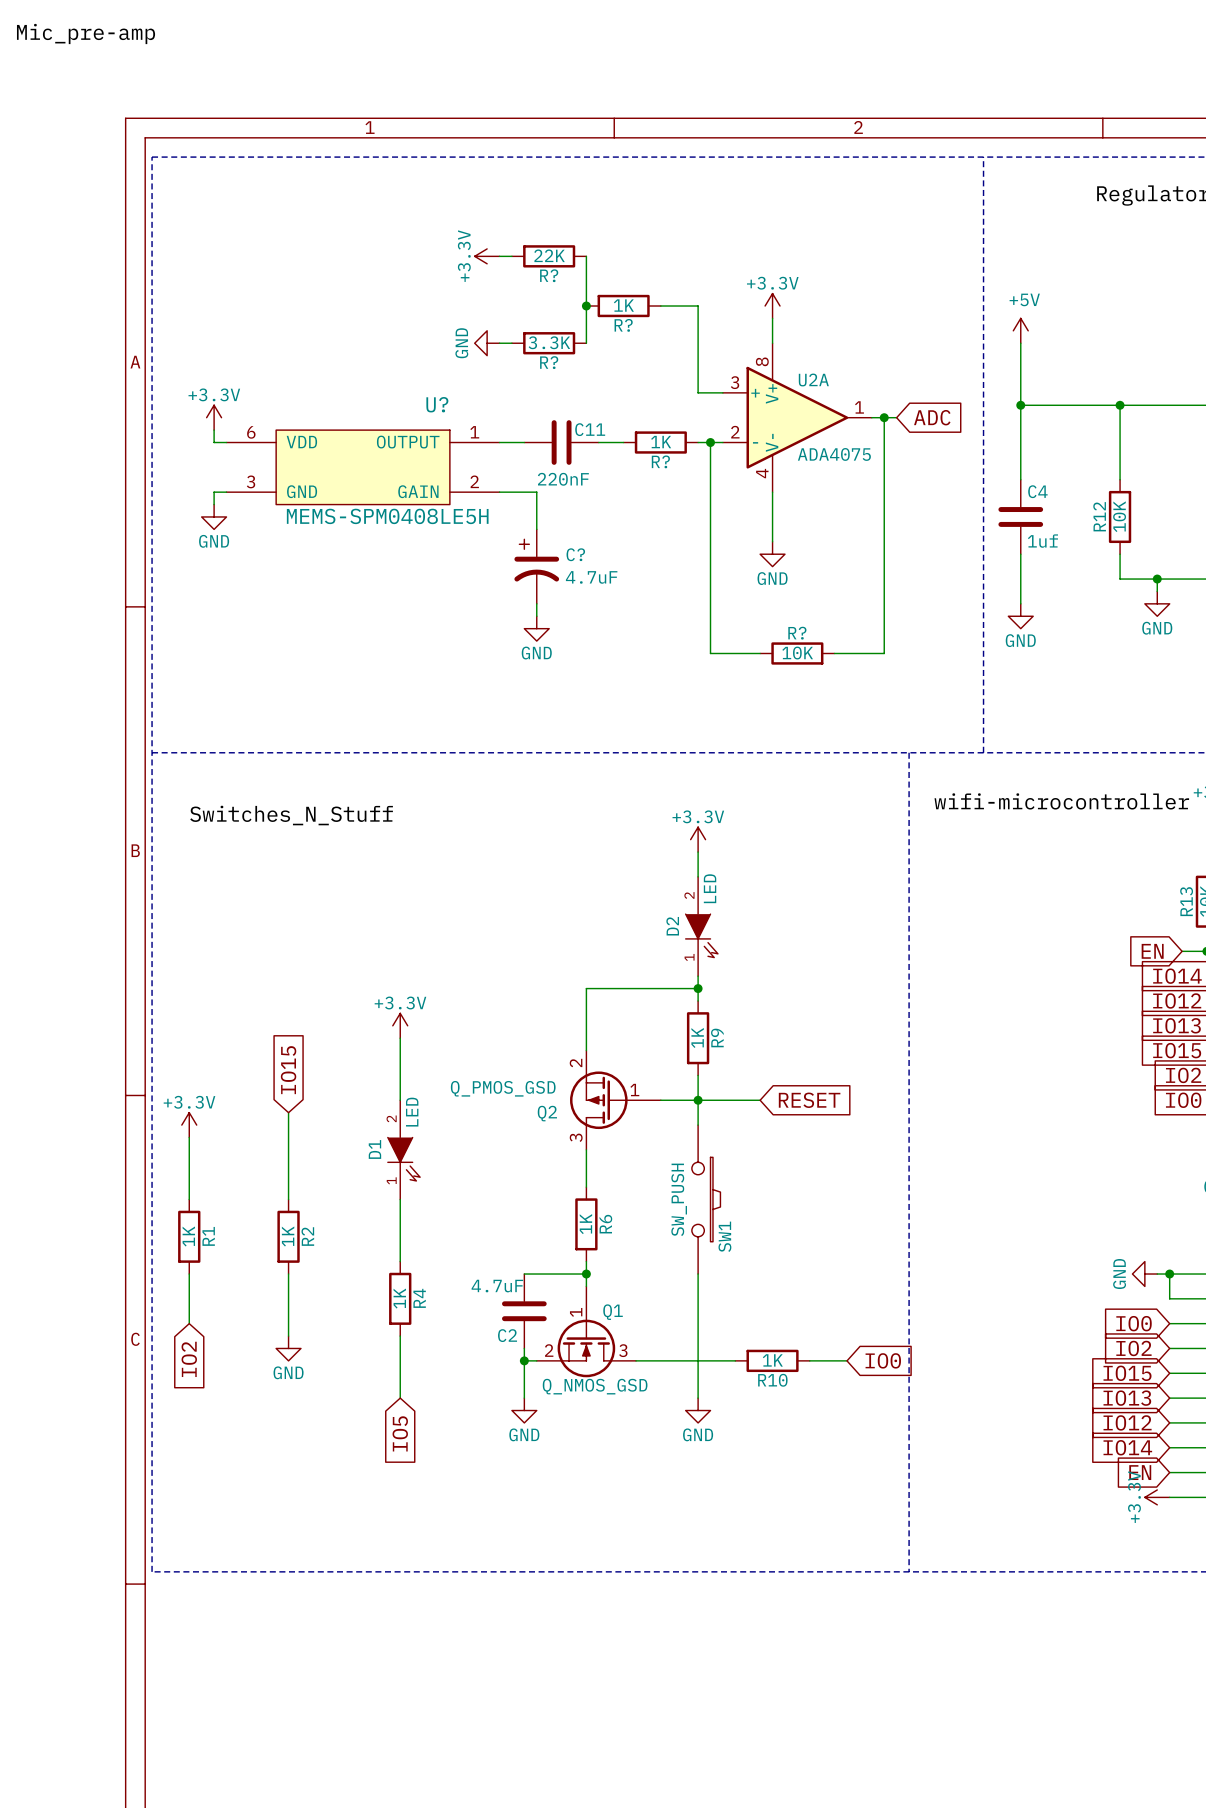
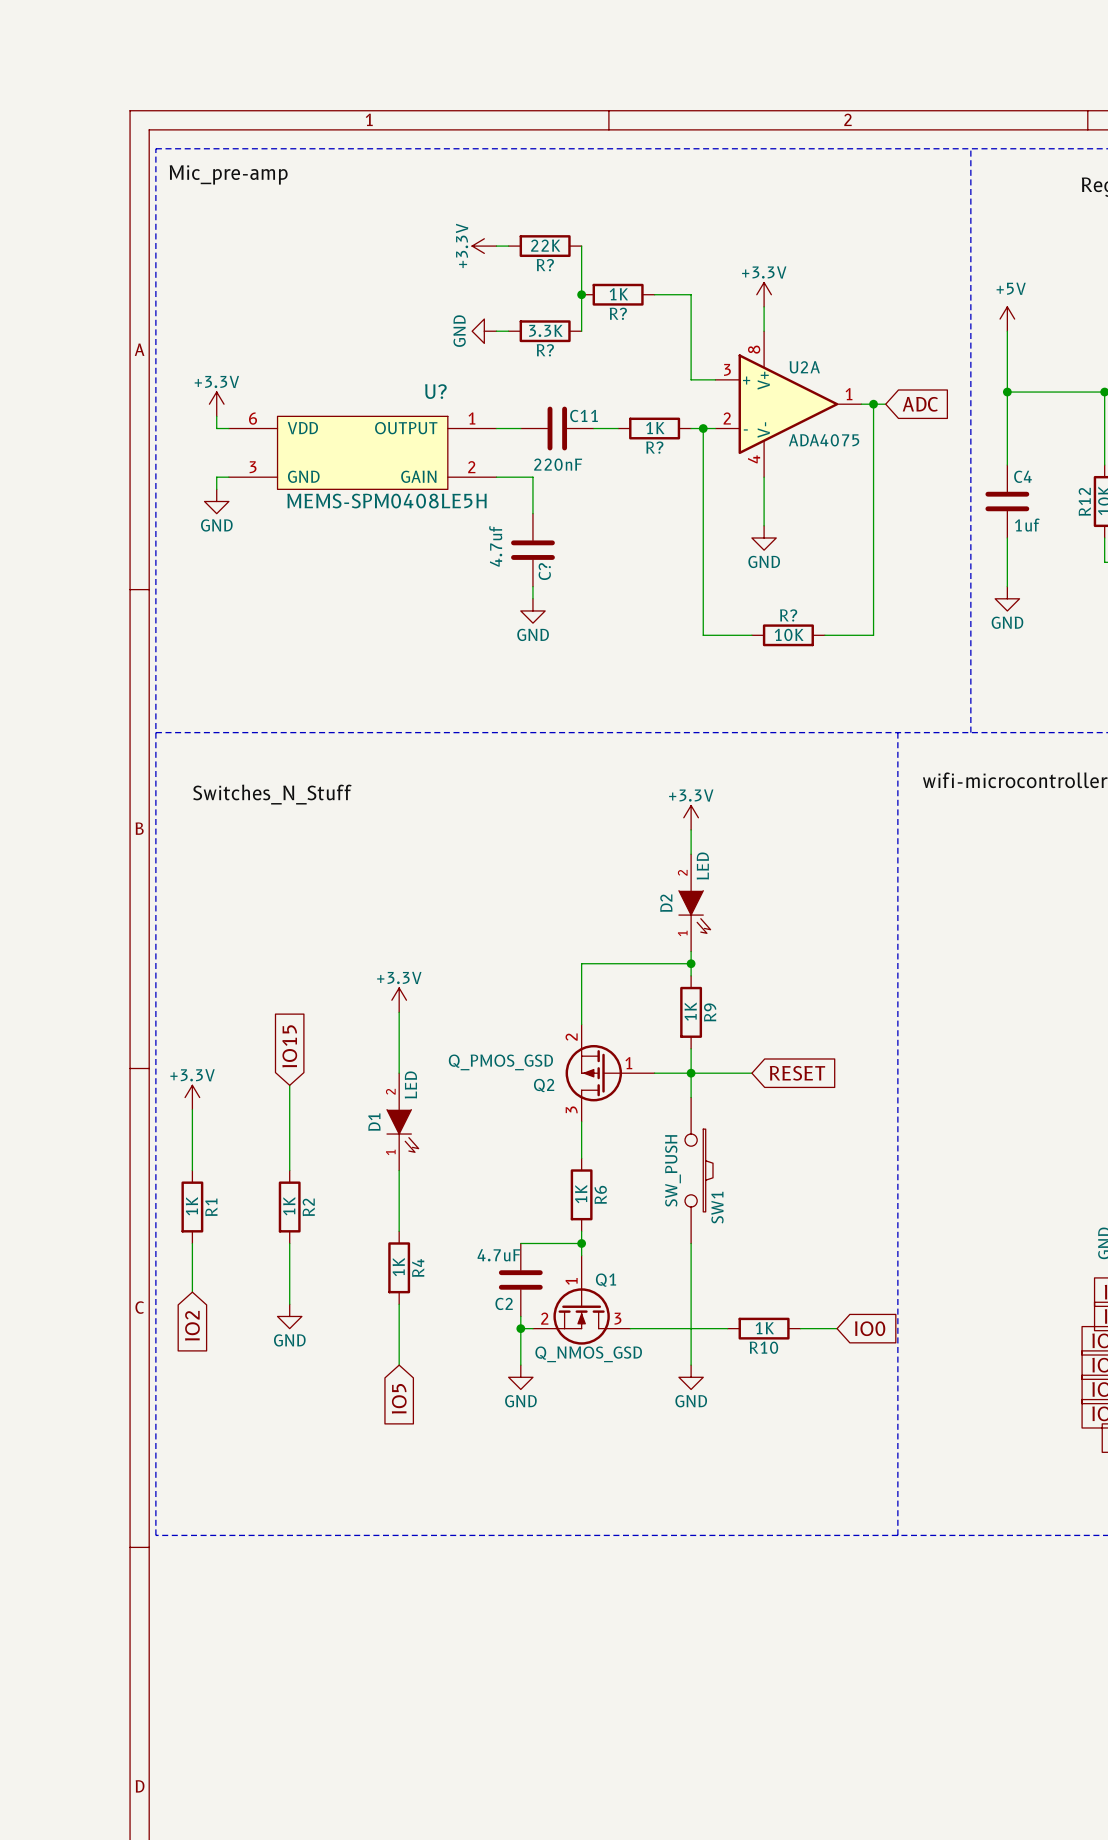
label position: Mic_pre-amp (86, 33) -> Mic_pre-amp (228, 174)
C? symbol: [514, 529, 560, 604] -> [511, 513, 555, 587]
C? name position: C? (575, 554) -> C? (544, 571)
C? value: 4.7uF (591, 577) -> 4.7uf (495, 546)

